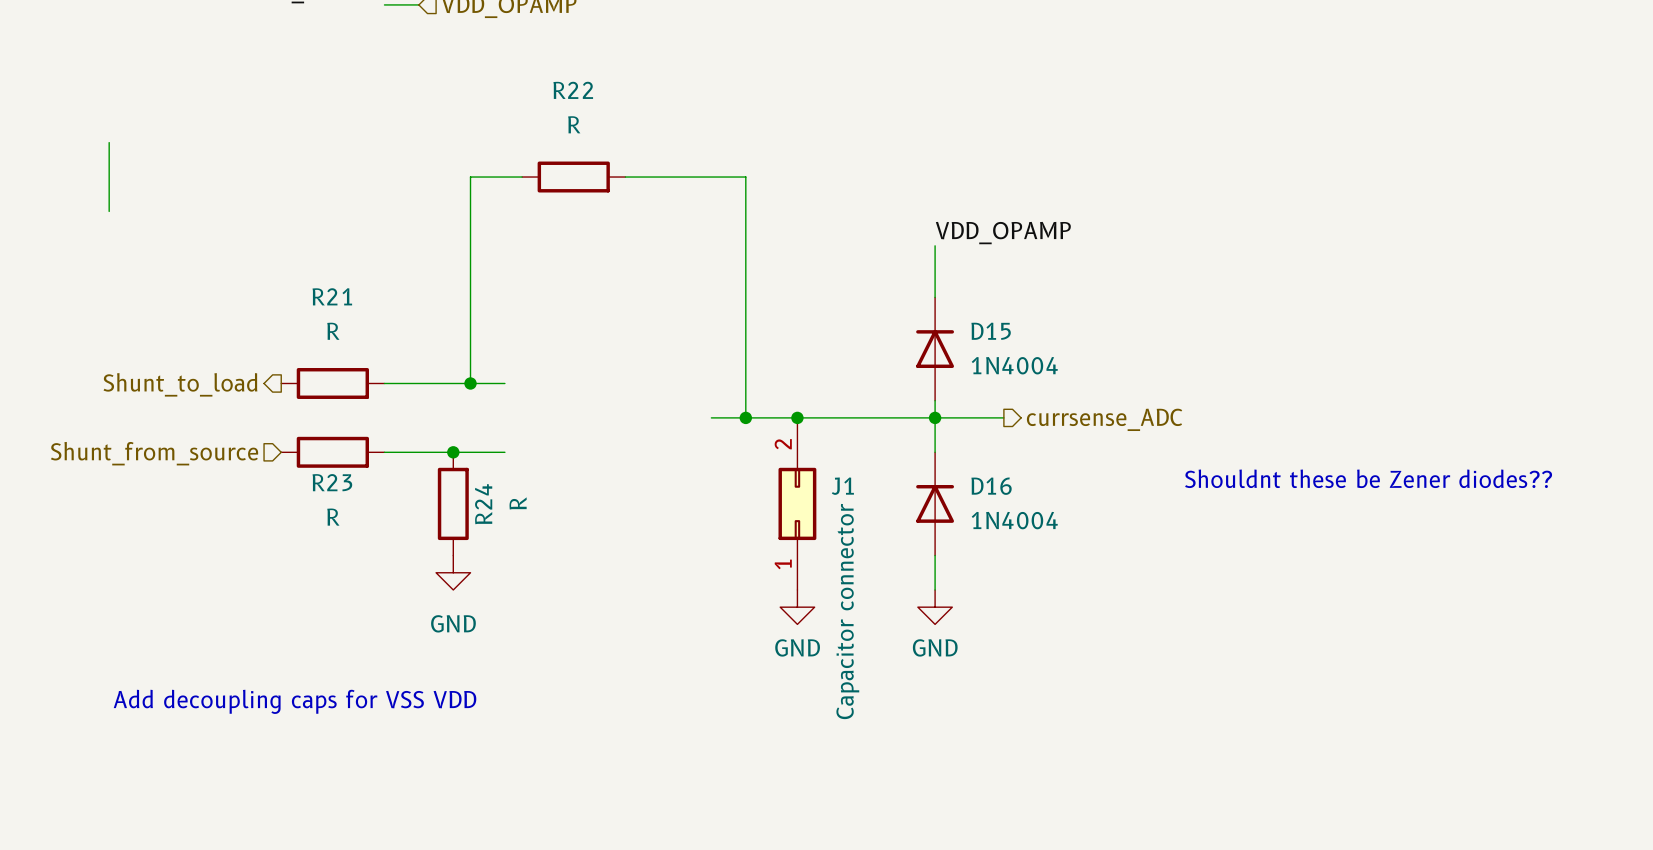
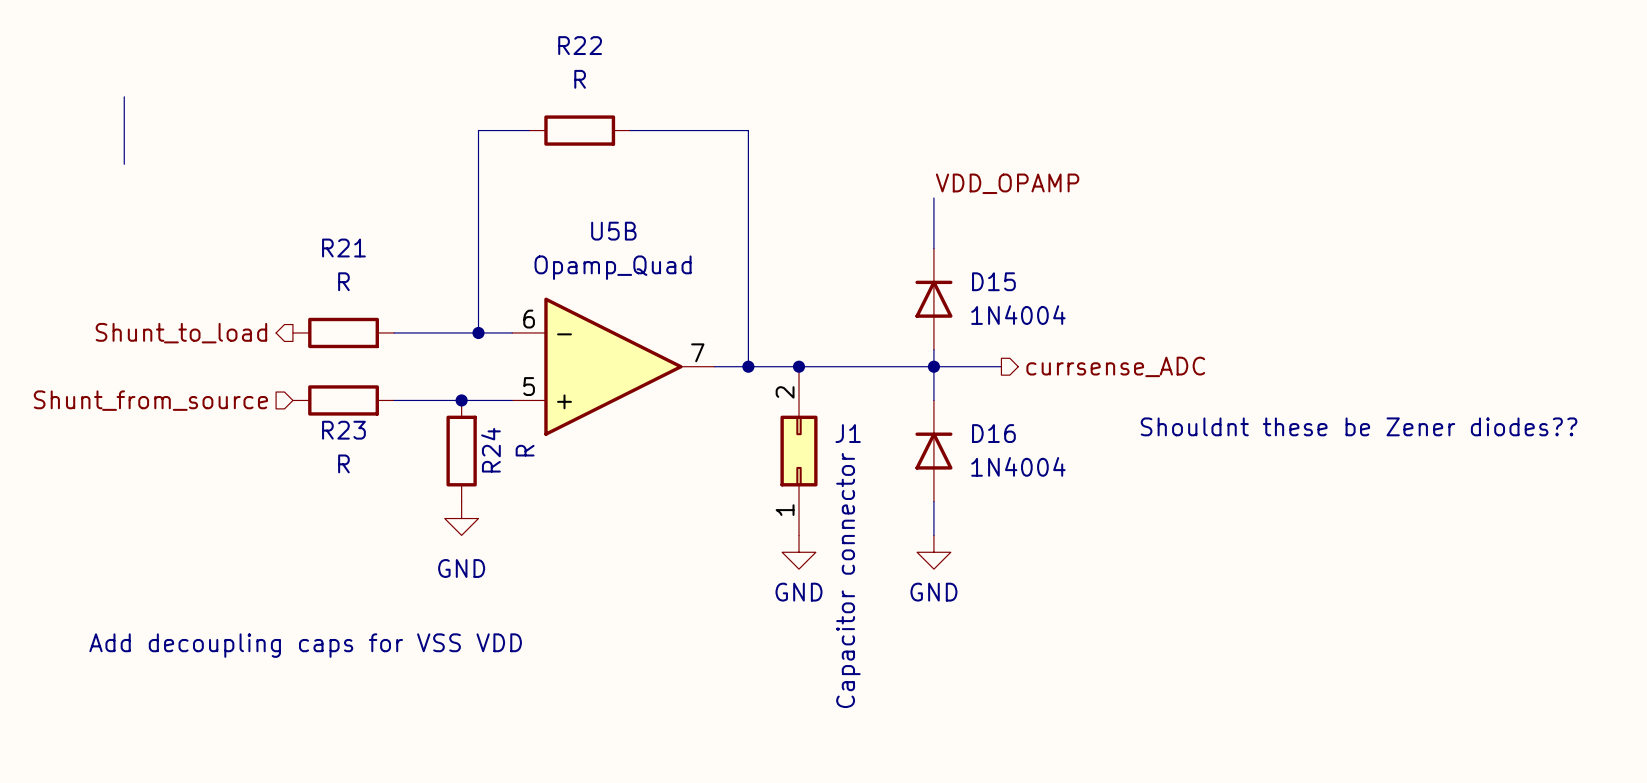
U5B: none -> Opamp_Quad (613, 366)

